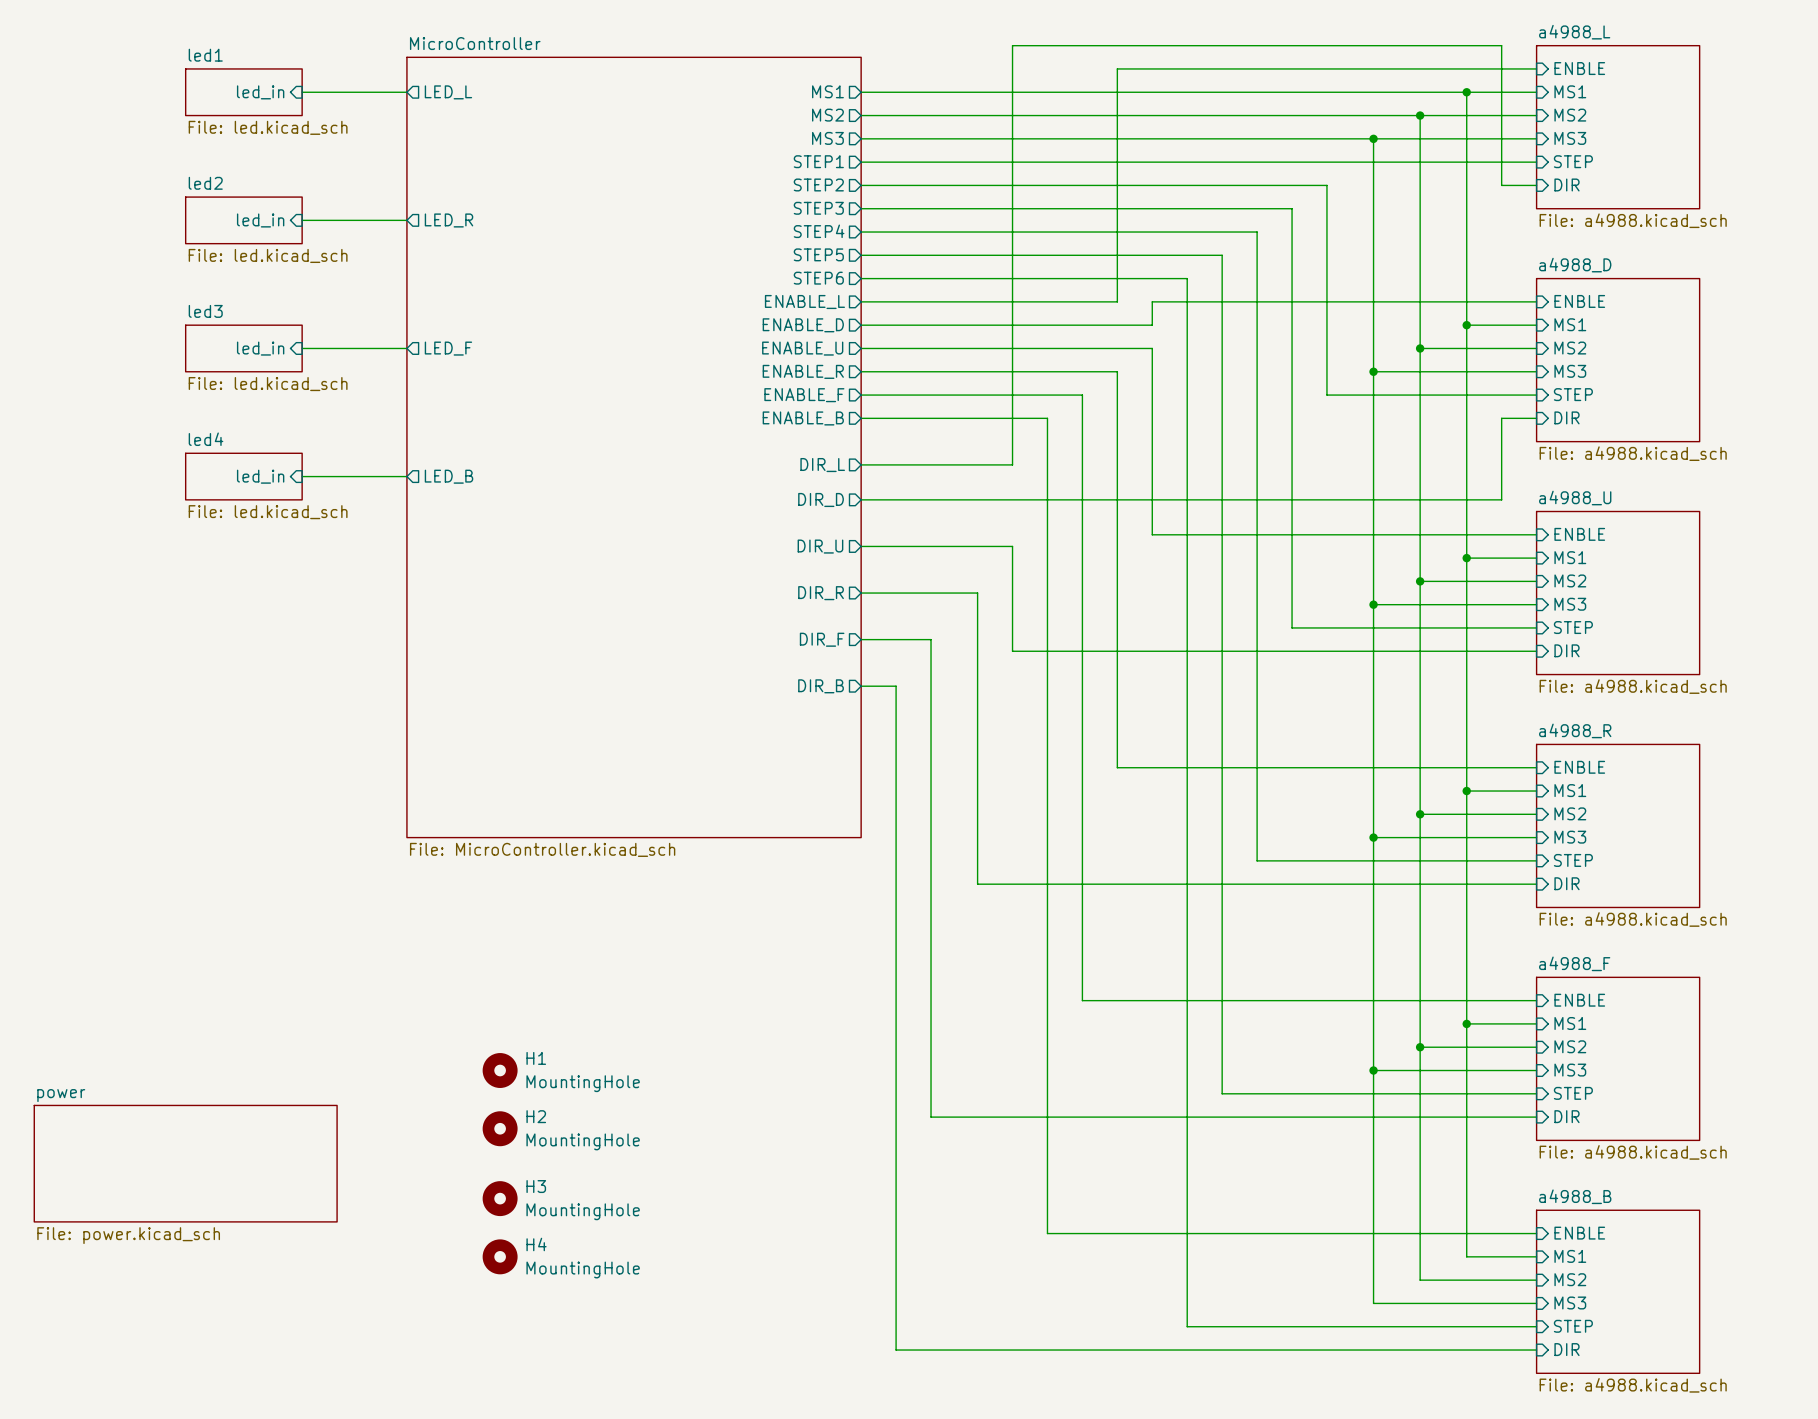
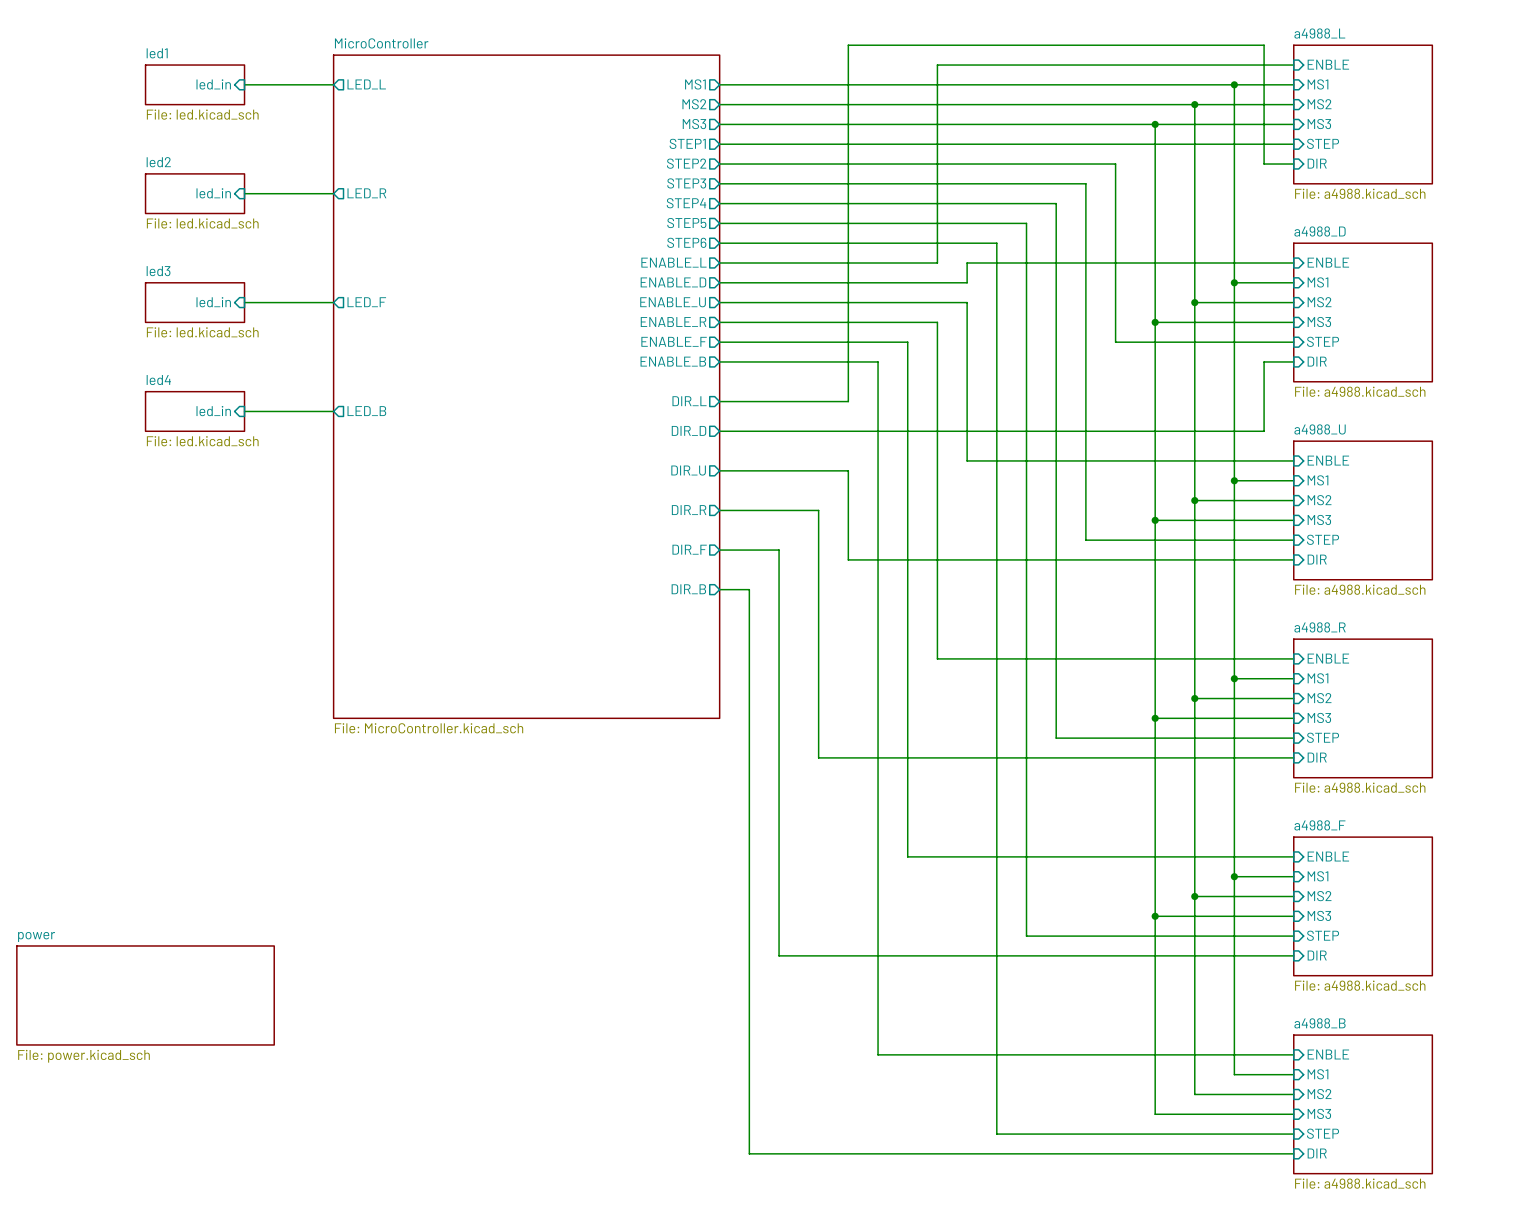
H1: MountingHole (500, 1070) -> none
H2: MountingHole (500, 1128) -> none
H3: MountingHole (500, 1198) -> none
H4: MountingHole (500, 1256) -> none

